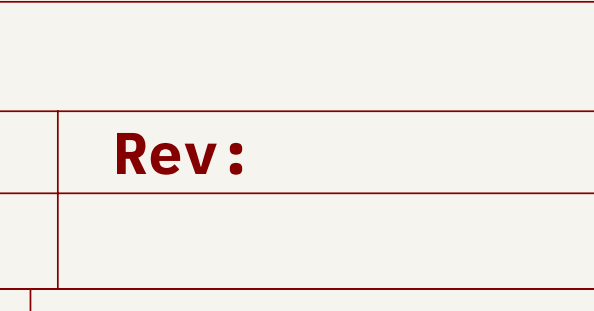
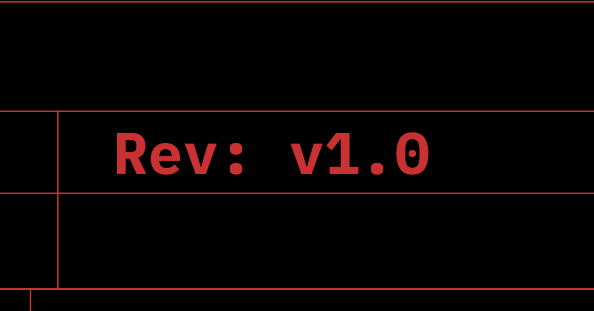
title block: Rev: (179, 153) -> Rev: v1.0 (272, 153)

